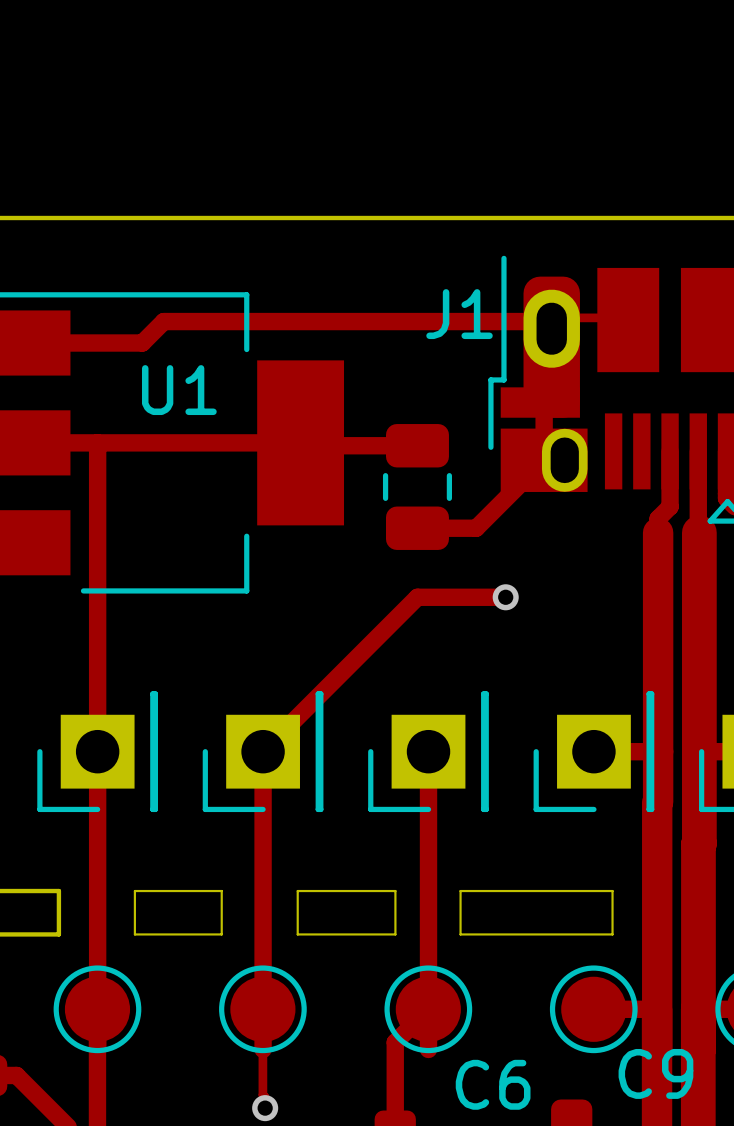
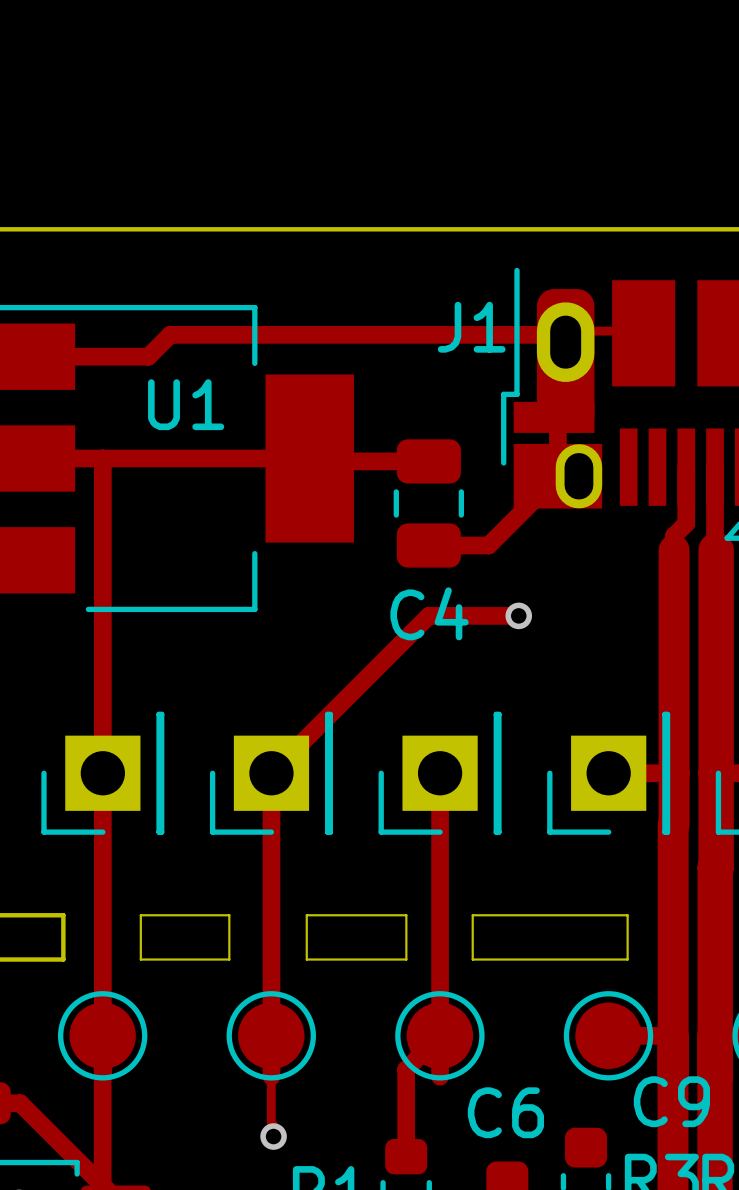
C4 name: none -> C4 (429, 613)

